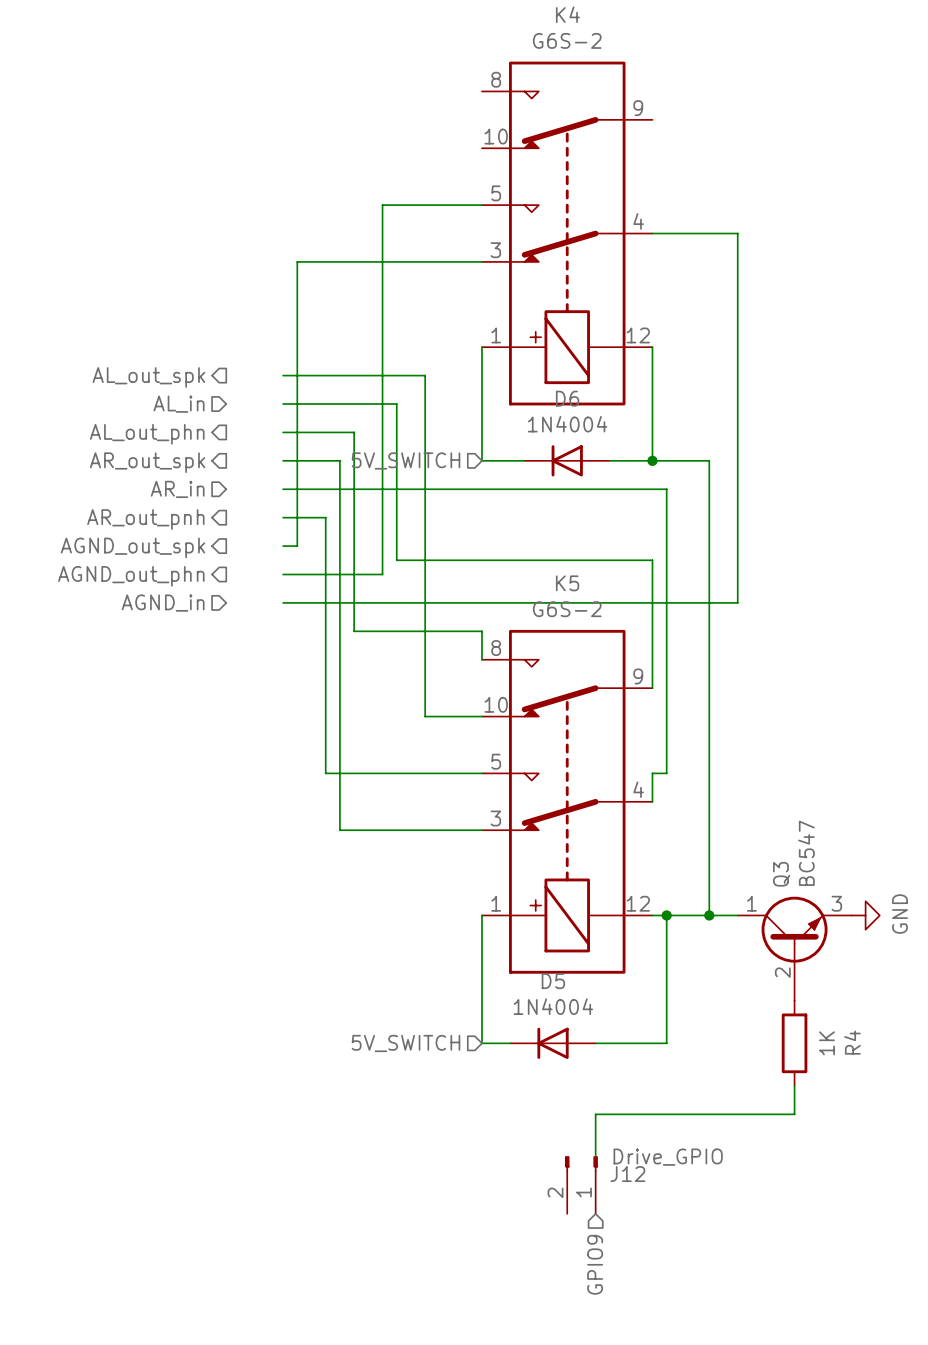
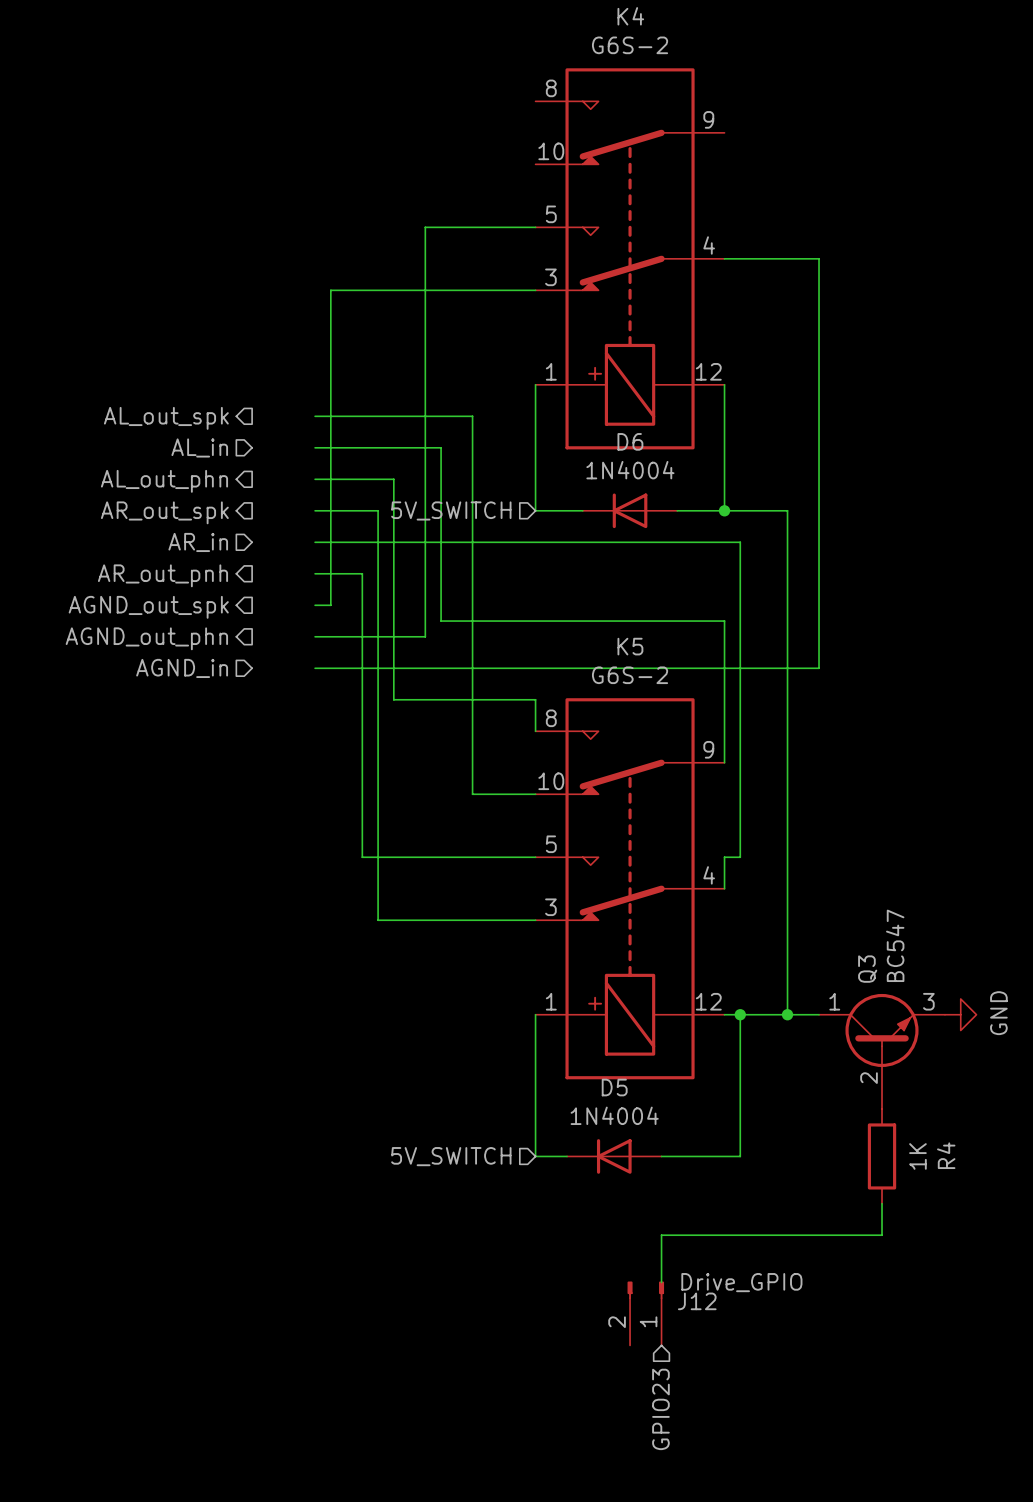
hierarchical label: GPIO9 (595, 1264) -> GPIO23 (660, 1409)

